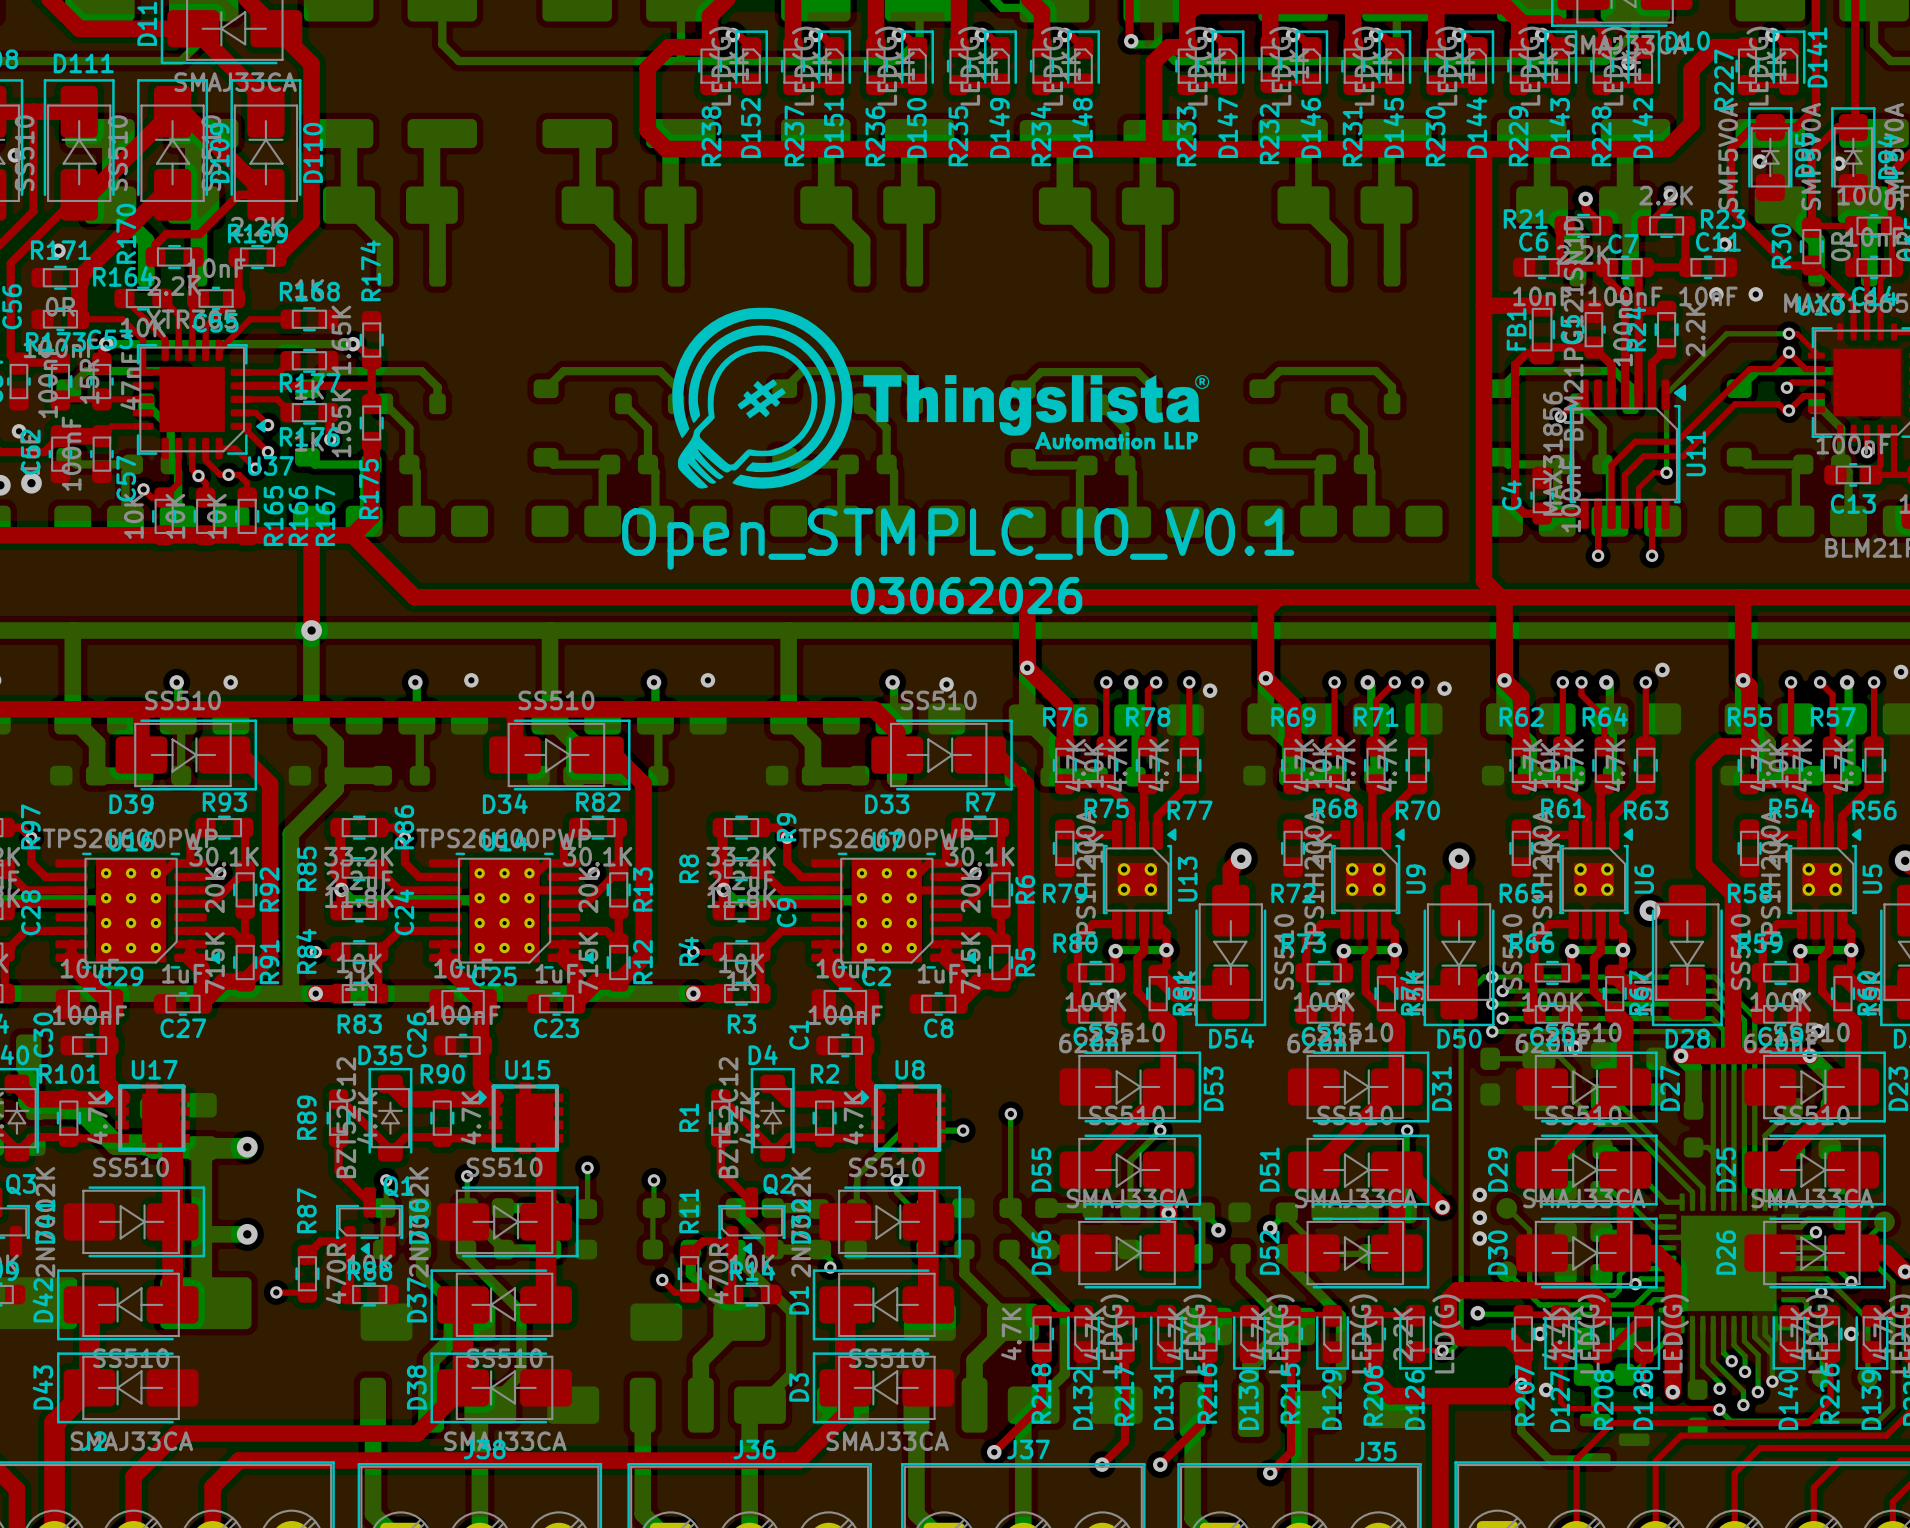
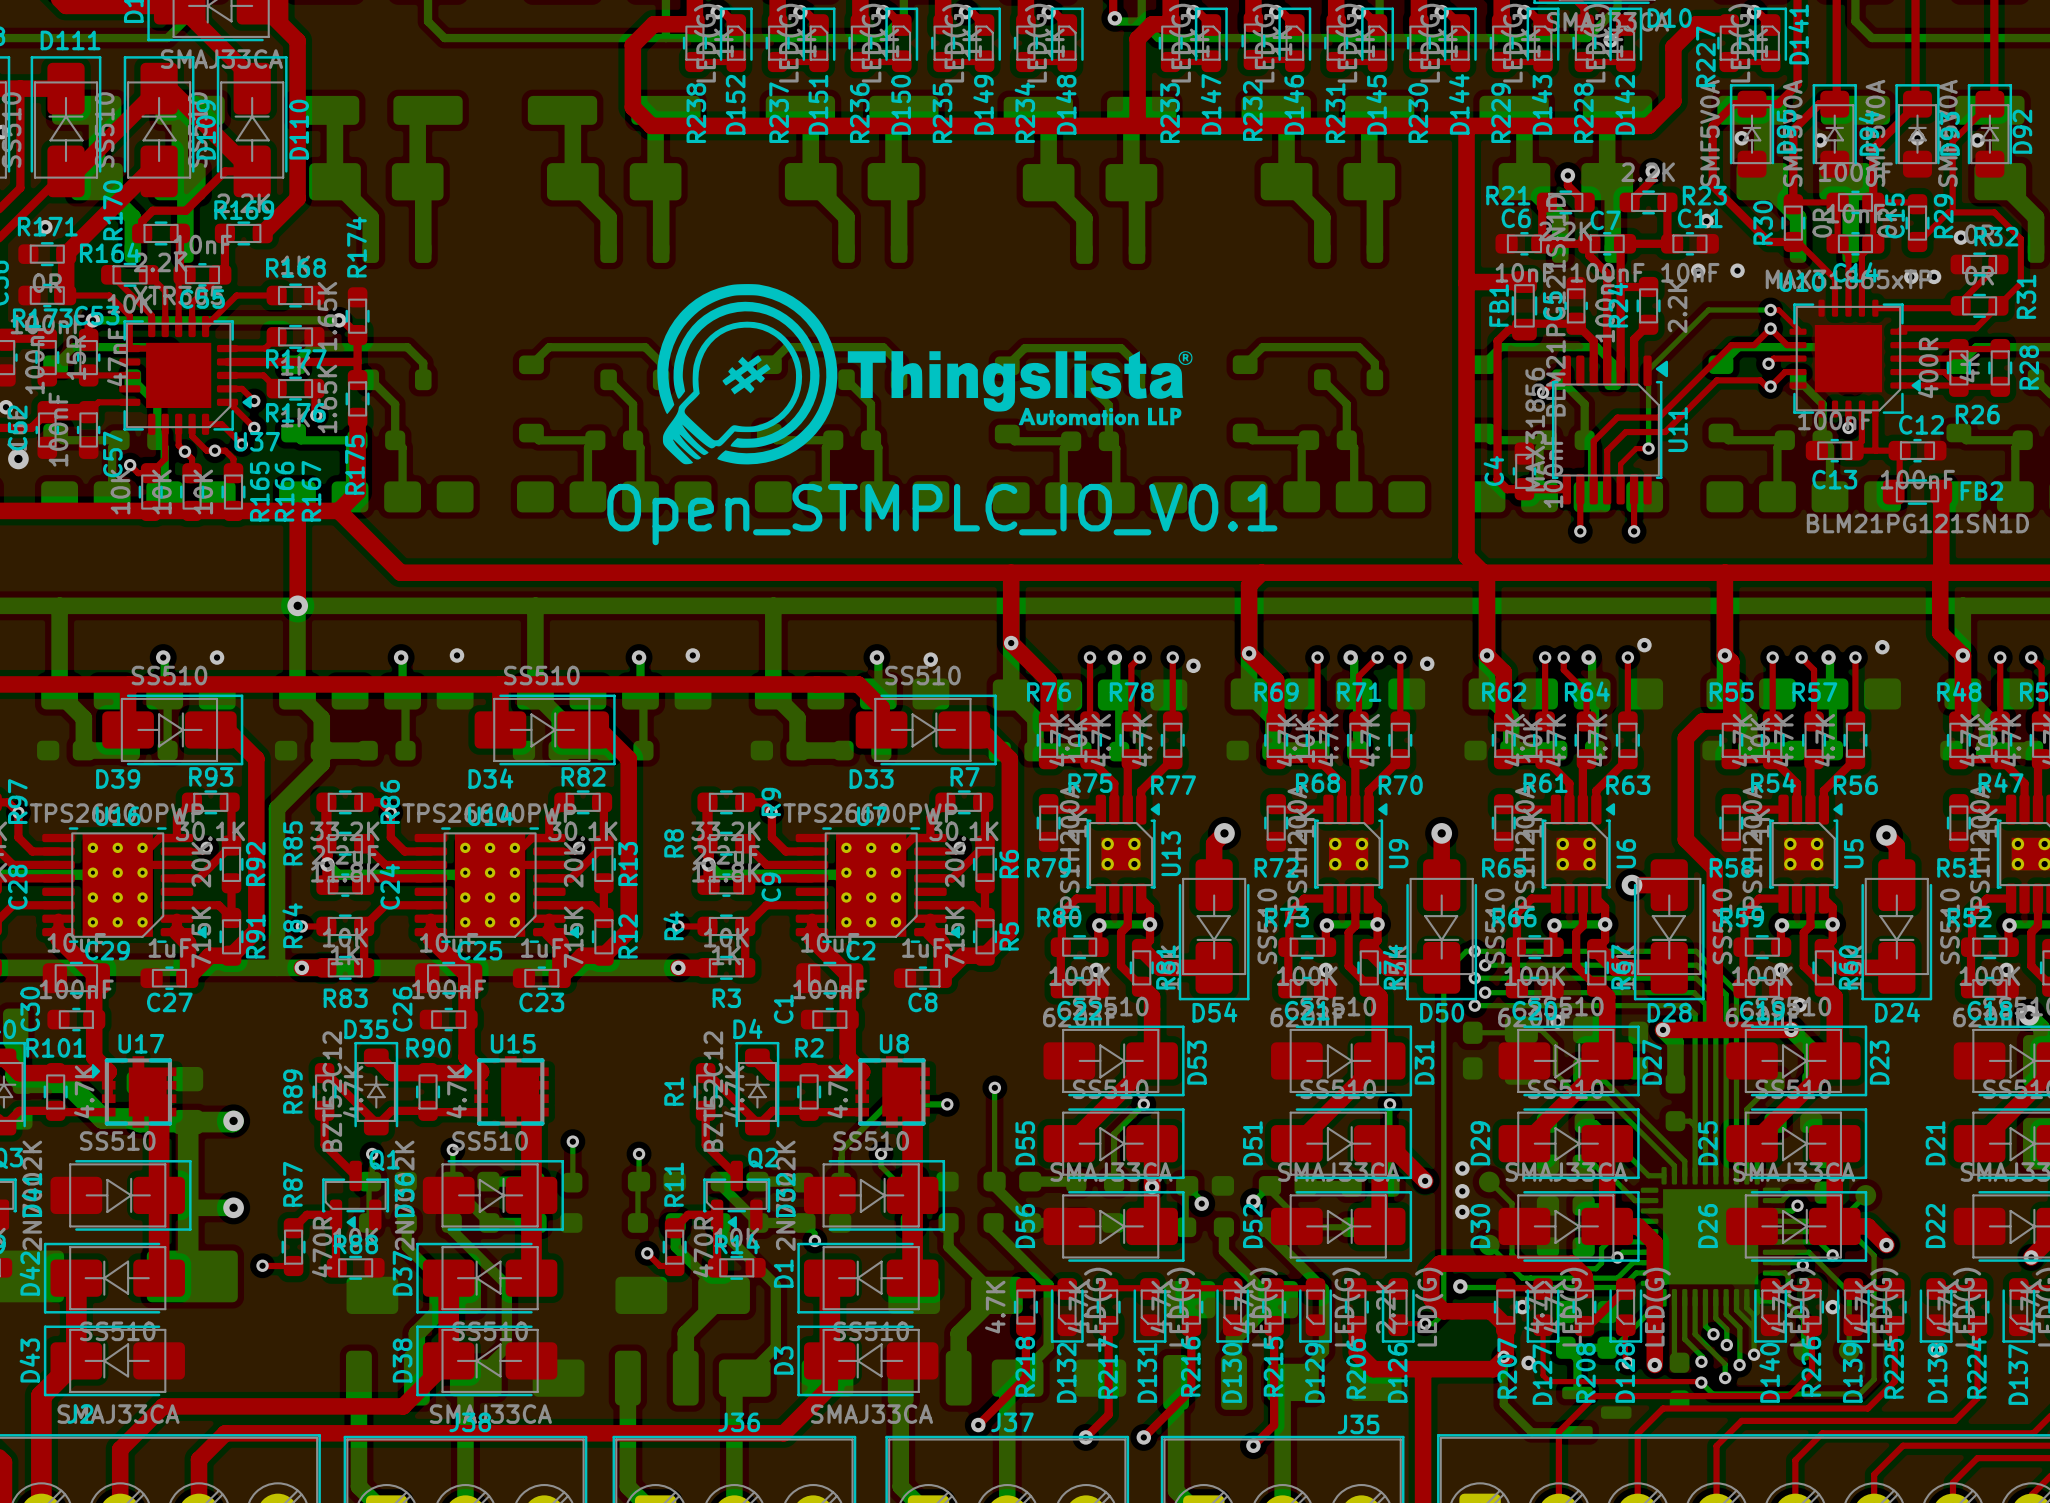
text: 03062026 (966, 595) -> none

